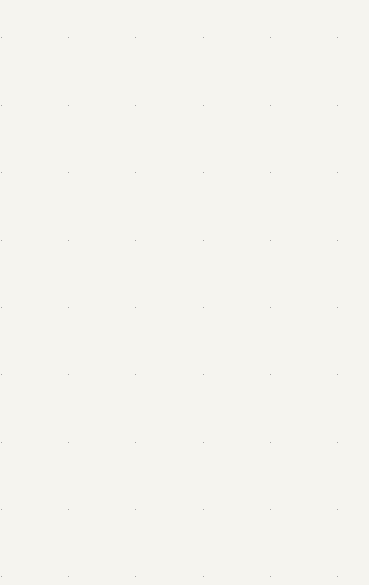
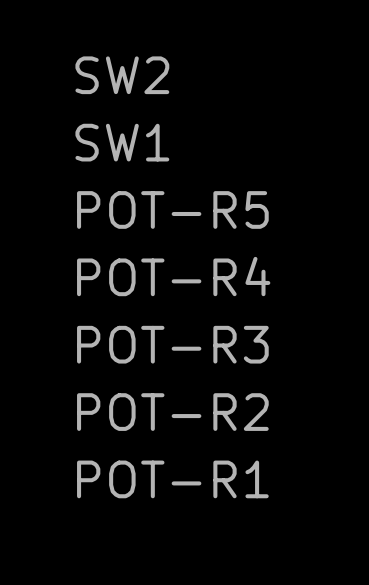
label: none -> SW2 (122, 75)
label: none -> SW1 (122, 142)
label: none -> POT-R5 (172, 209)
label: none -> POT-R4 (173, 276)
label: none -> POT-R3 (172, 344)
label: none -> POT-R2 (172, 412)
label: none -> POT-R1 (172, 479)

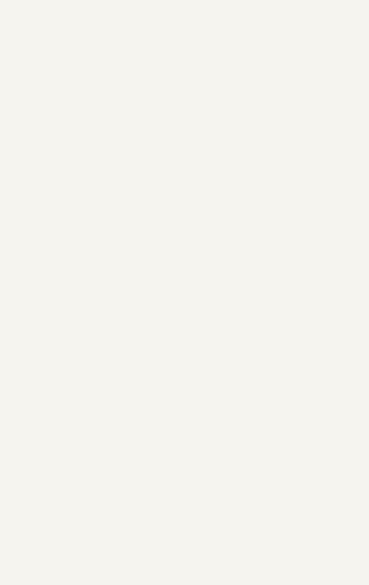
label: SW2 (122, 75) -> none
label: SW1 (122, 142) -> none
label: POT-R5 (172, 209) -> none
label: POT-R4 (173, 276) -> none
label: POT-R3 (172, 344) -> none
label: POT-R2 (172, 412) -> none
label: POT-R1 (172, 479) -> none

